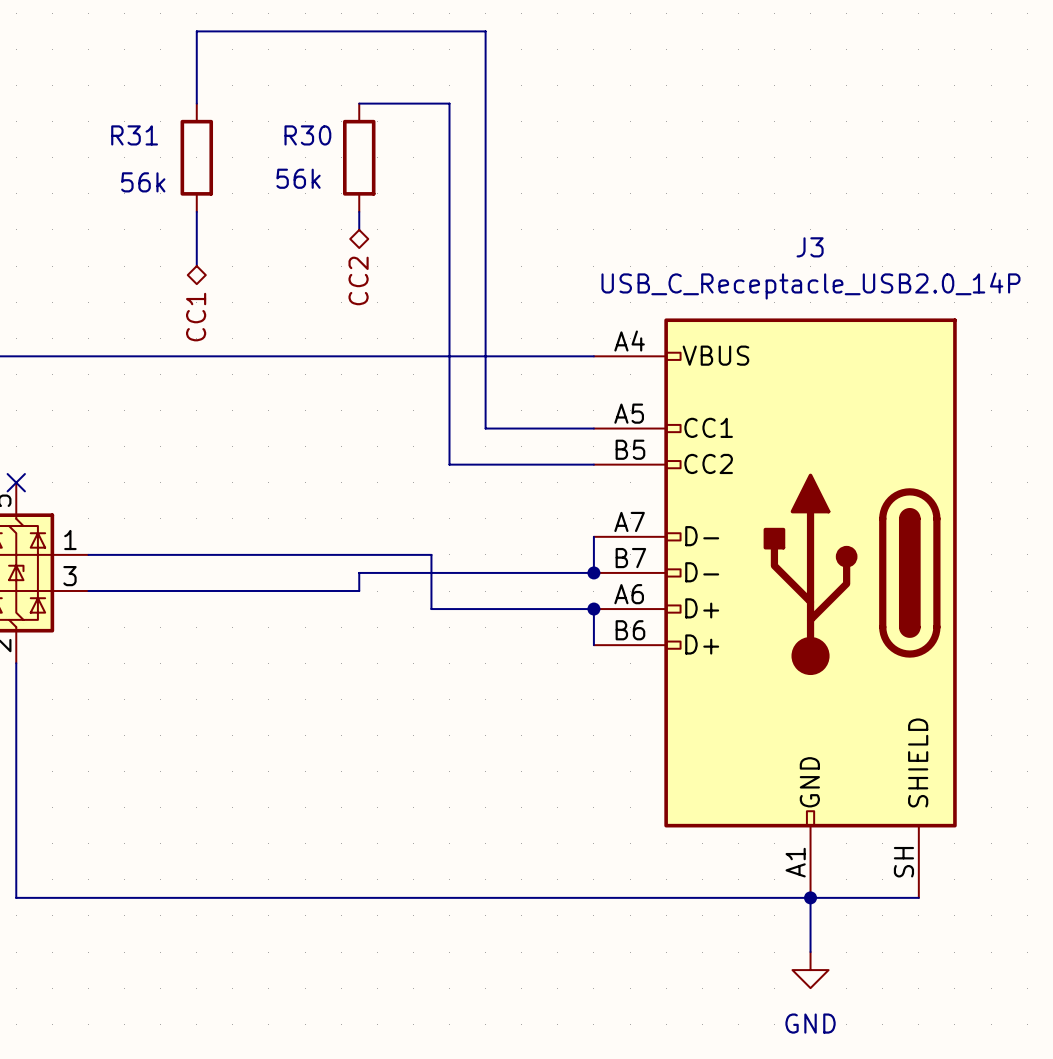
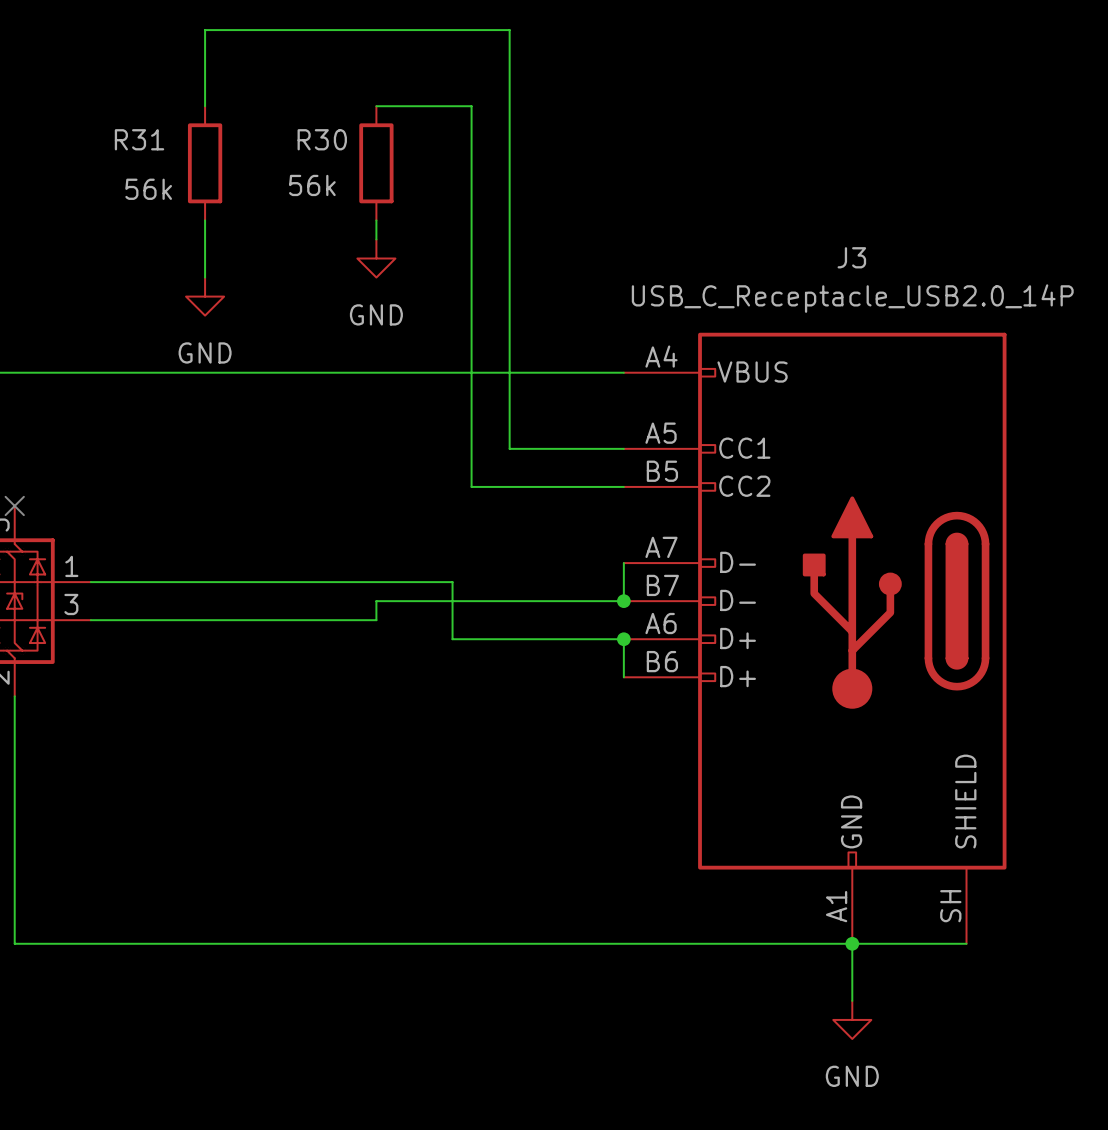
power symbol: none -> GND (376, 258)
hierarchical label: CC2 (358, 280) -> none
power symbol: none -> GND (205, 296)
hierarchical label: CC1 (196, 317) -> none

